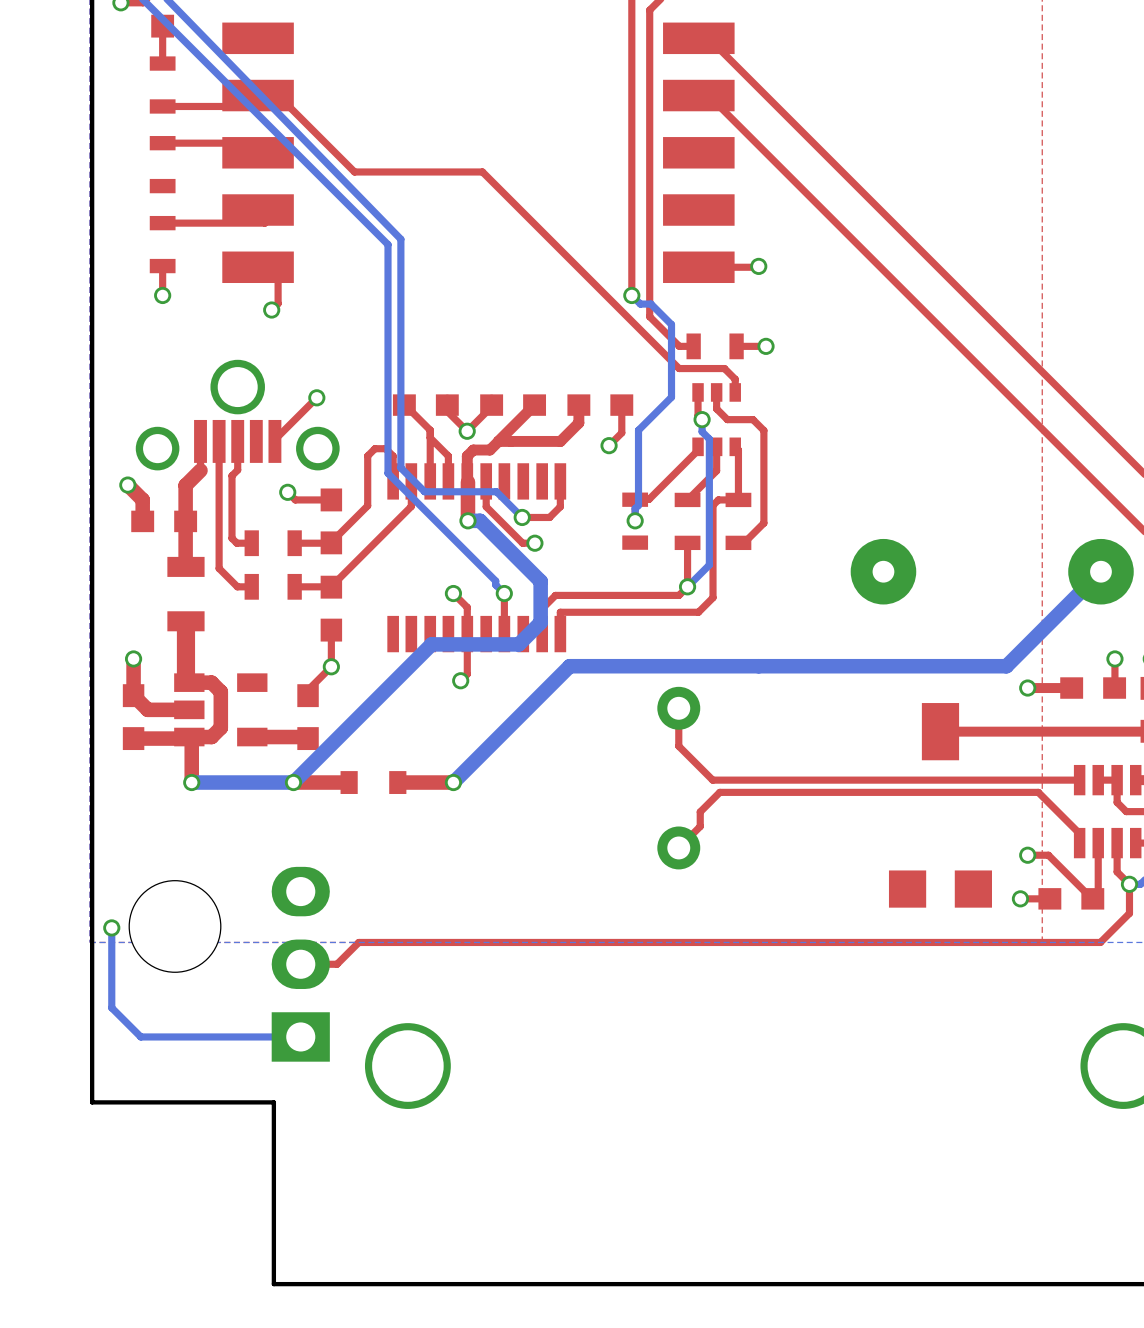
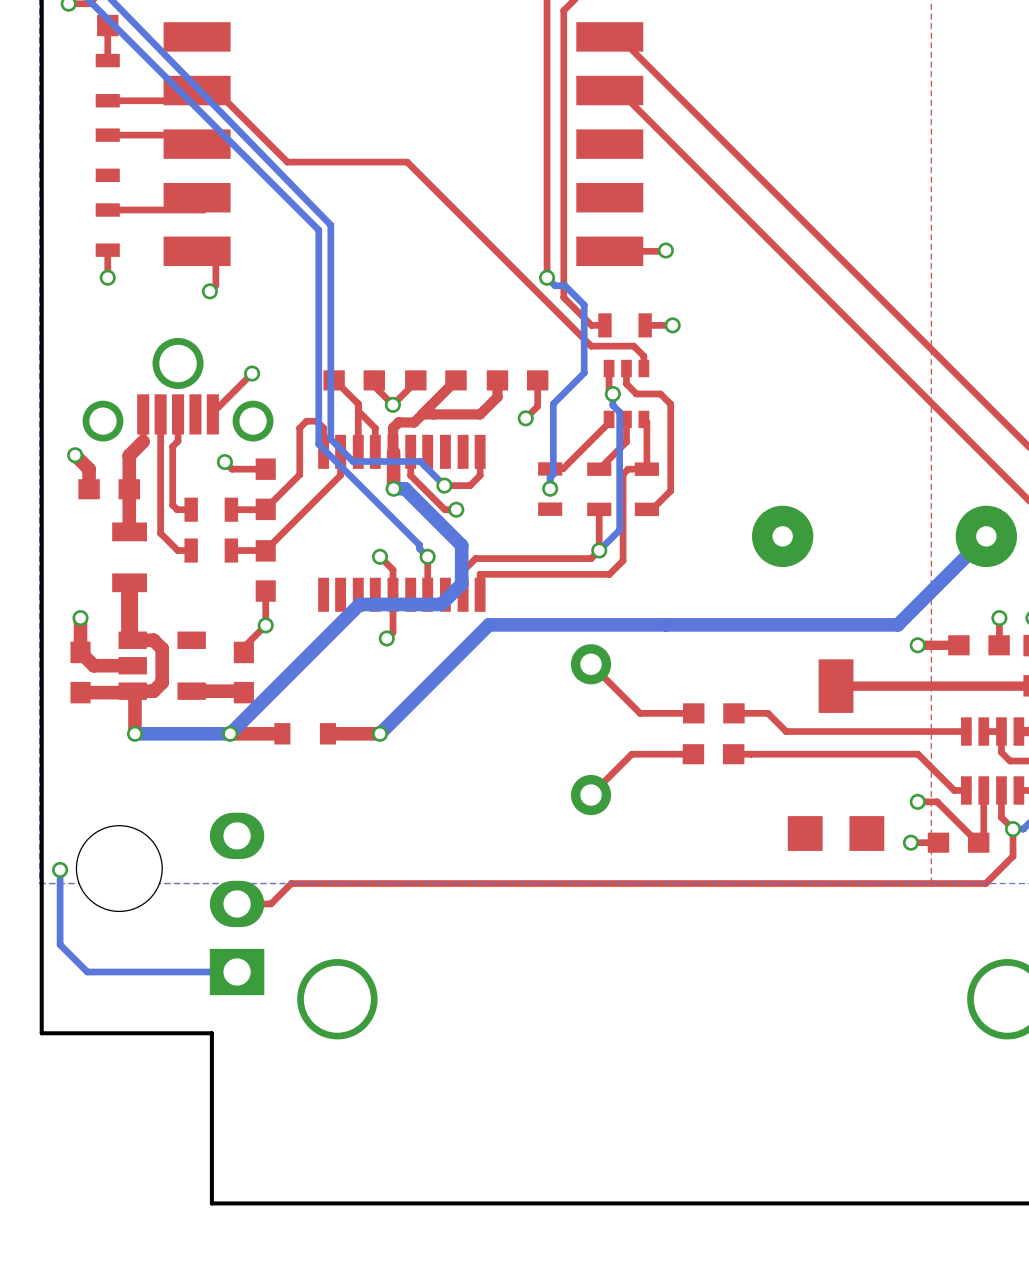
top track: (678, 708) (678, 746) (712, 780) (887, 780) -> (591, 664) (640, 713) (693, 713)
part: none -> (713, 713)
top track: none -> (733, 713) (767, 713) (786, 731)
part: none -> (713, 754)
top track: none -> (733, 754) (918, 754) (954, 790) (966, 790)
top track: (700, 826) (700, 811) (719, 792) (1038, 792) (1079, 833) -> (611, 774) (631, 754) (693, 754)

